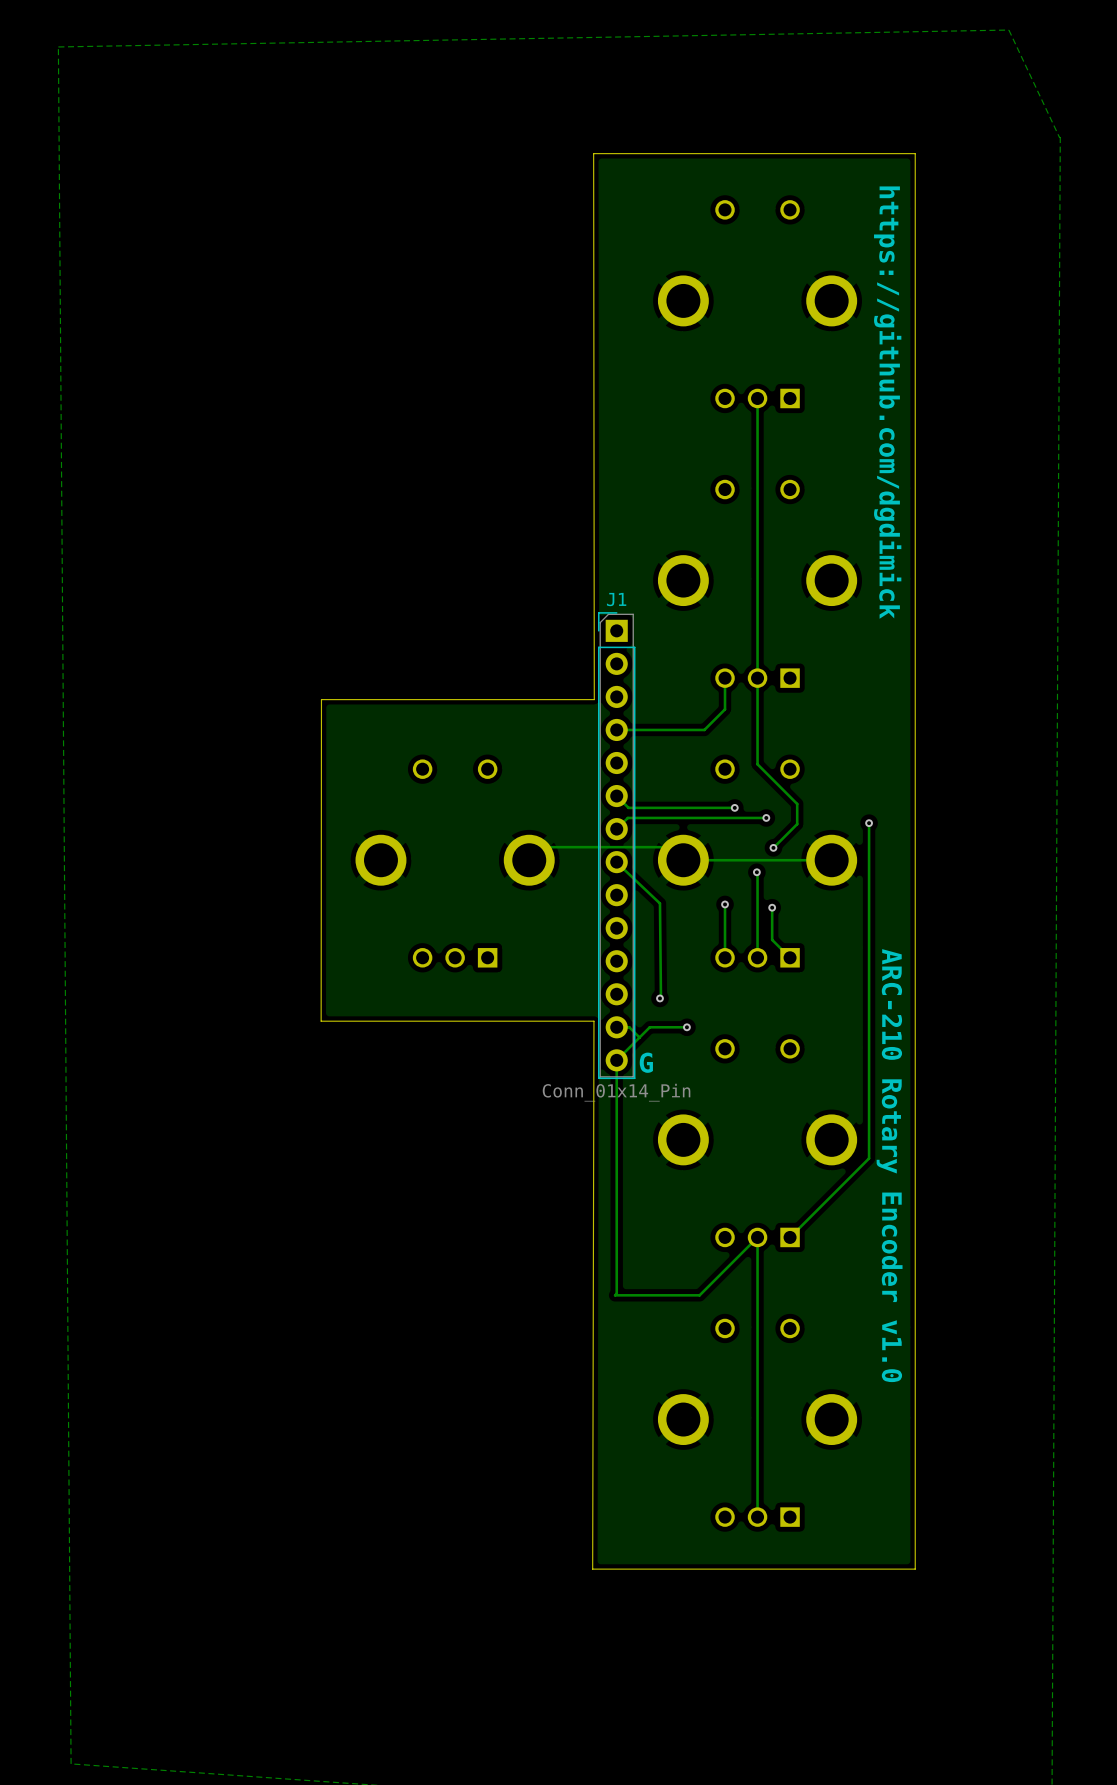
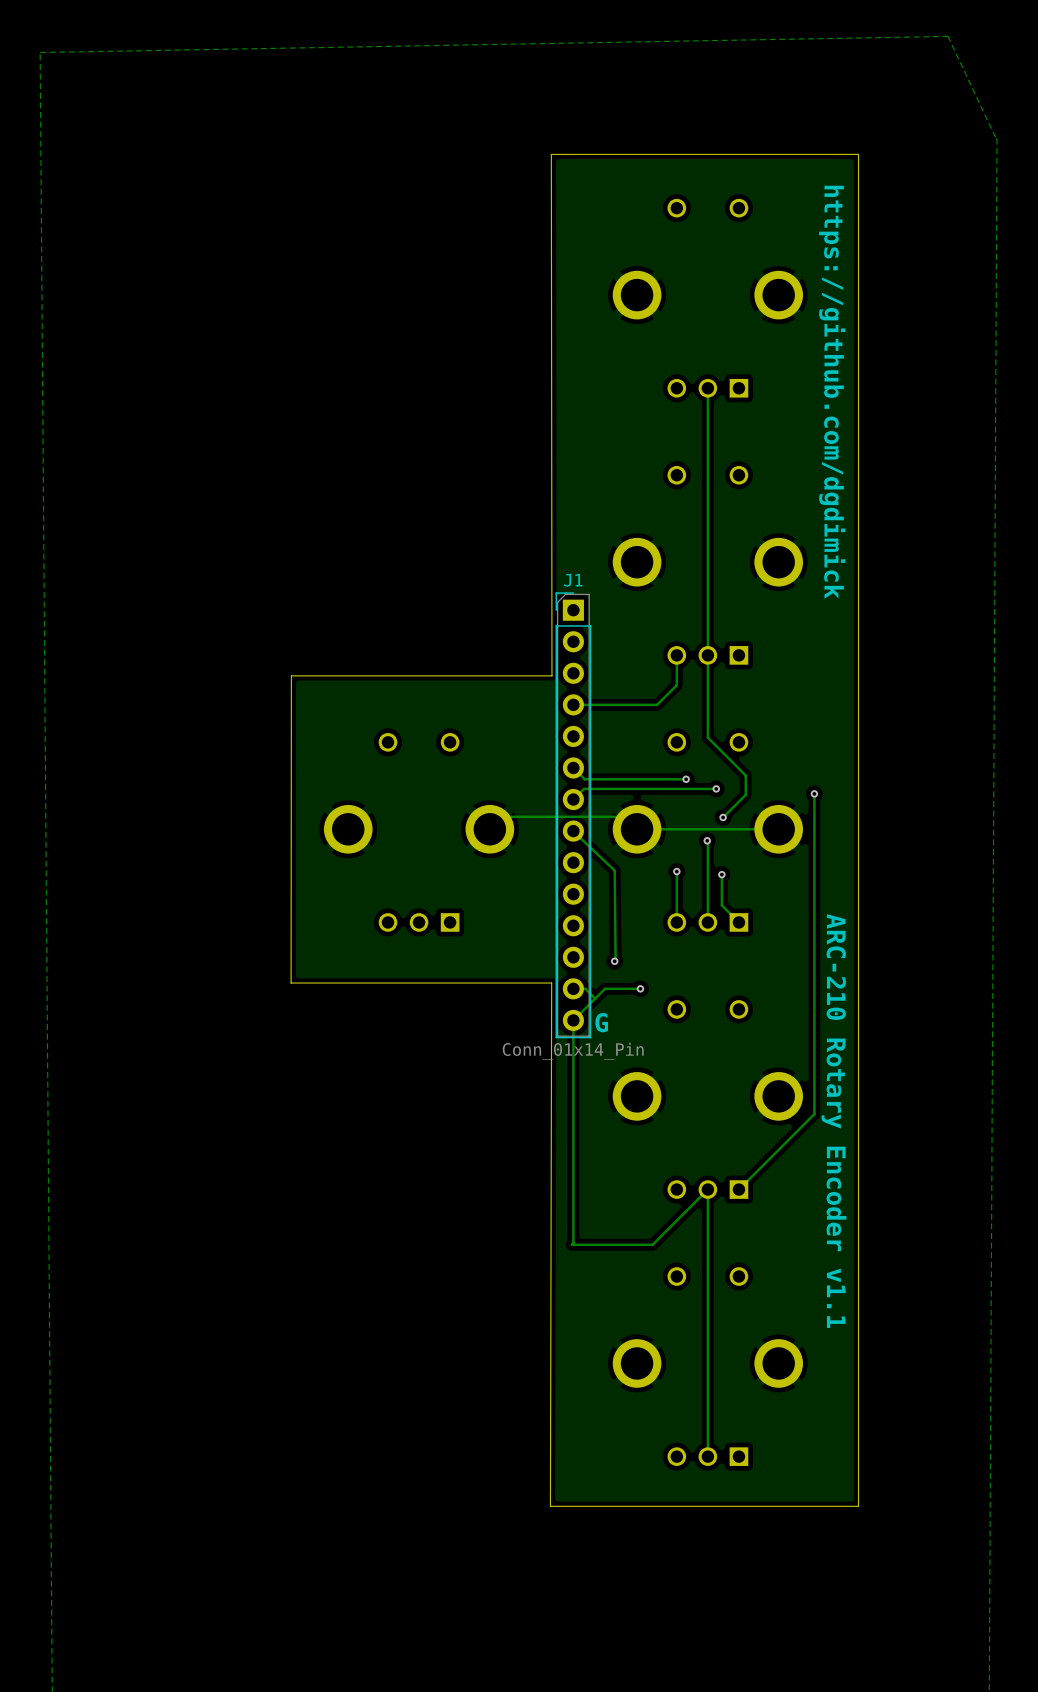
text: ARC-210 Rotary Encoder v1.0 (889, 1165) -> ARC-210 Rotary Encoder v1.1 (834, 1121)

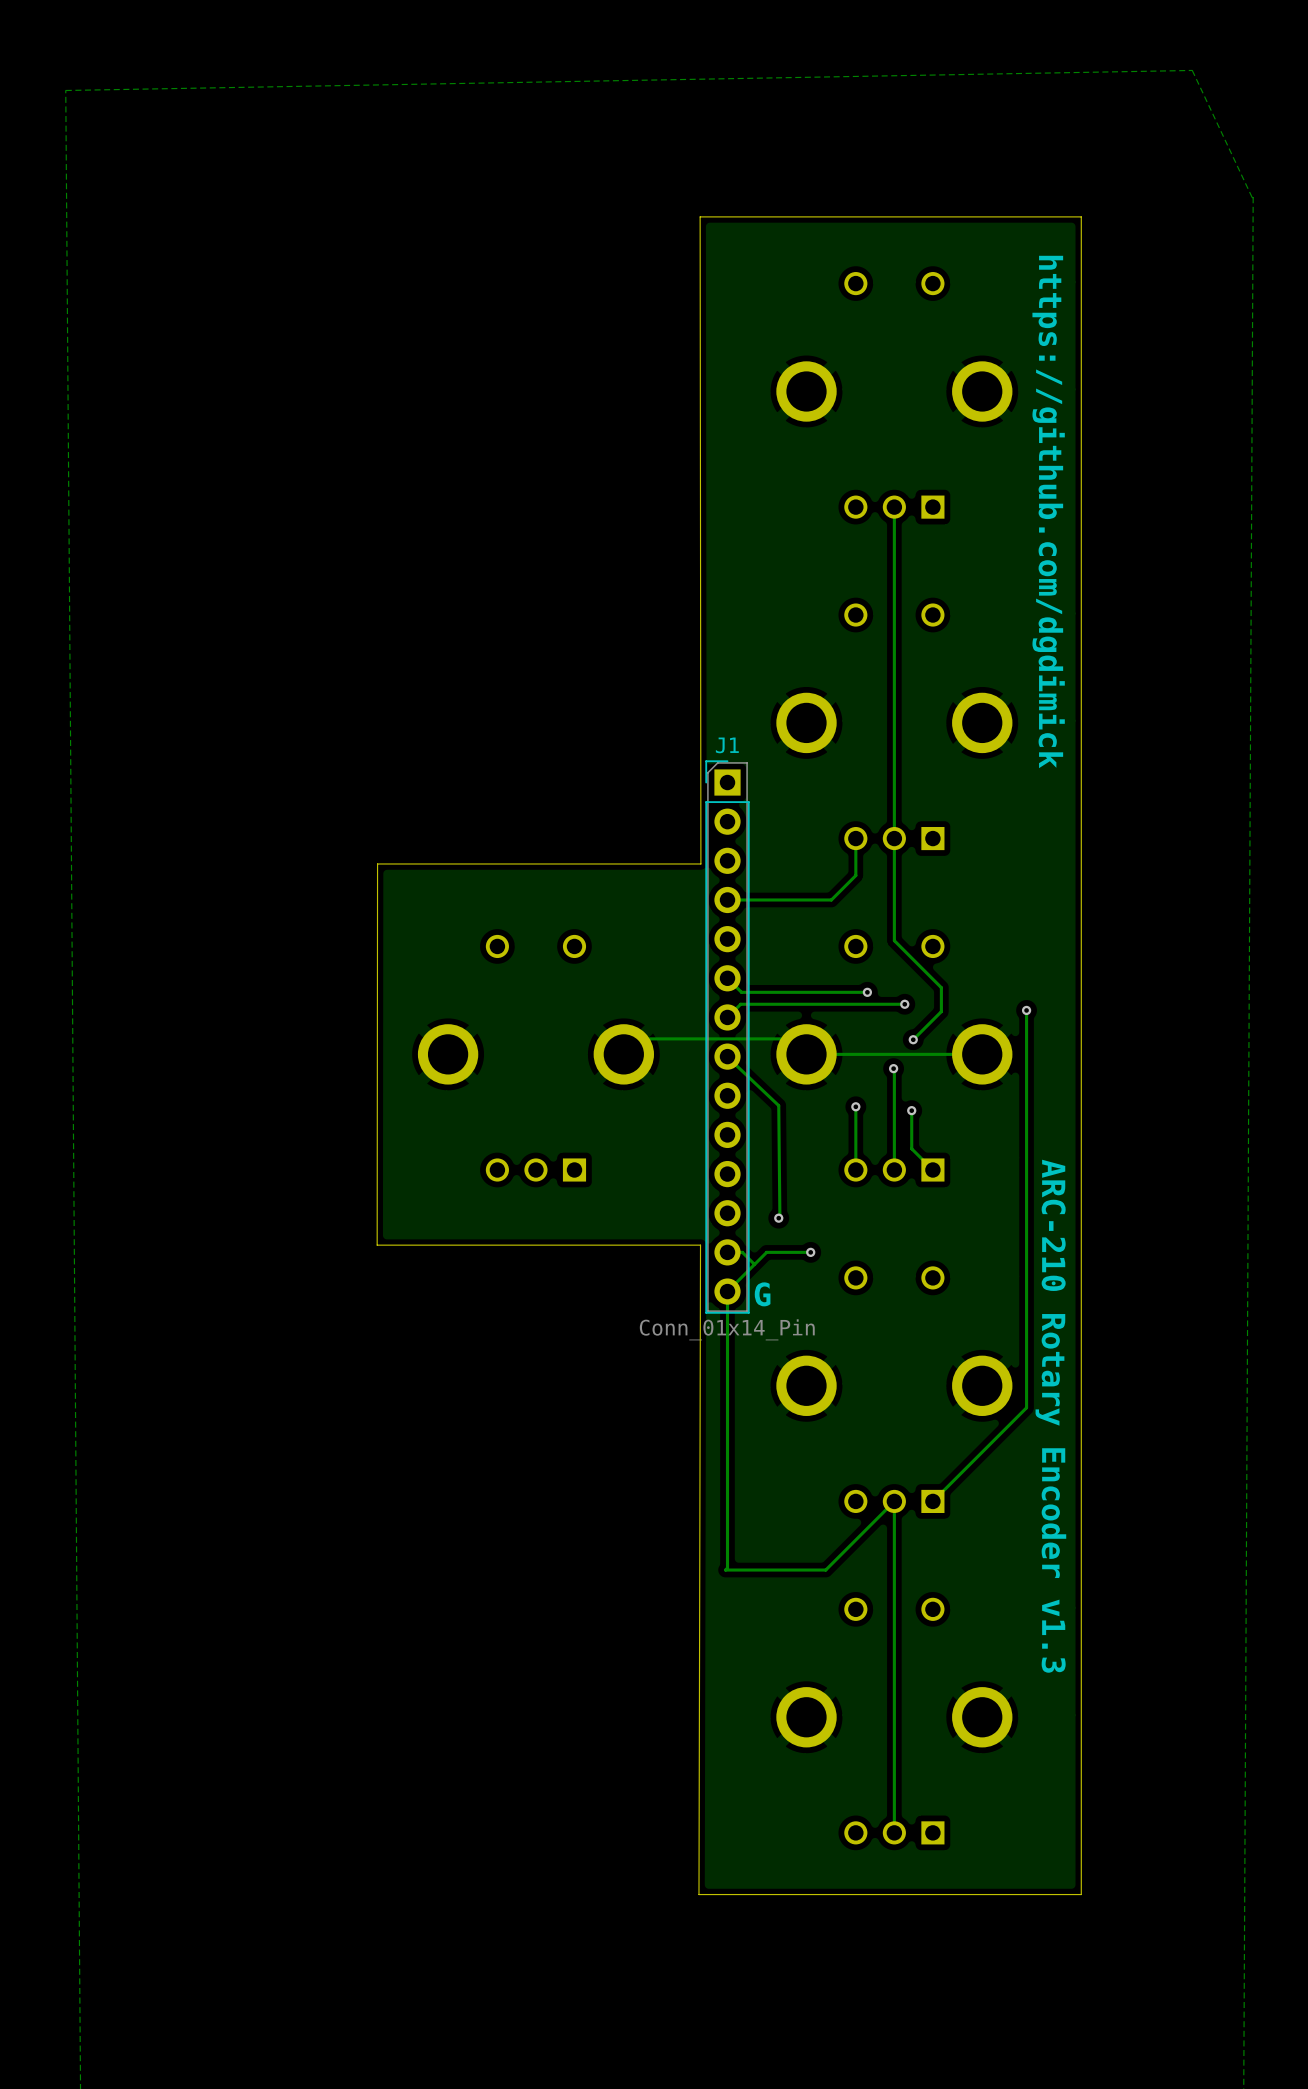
text: ARC-210 Rotary Encoder v1.1 (834, 1121) -> ARC-210 Rotary Encoder v1.3 (1050, 1416)

